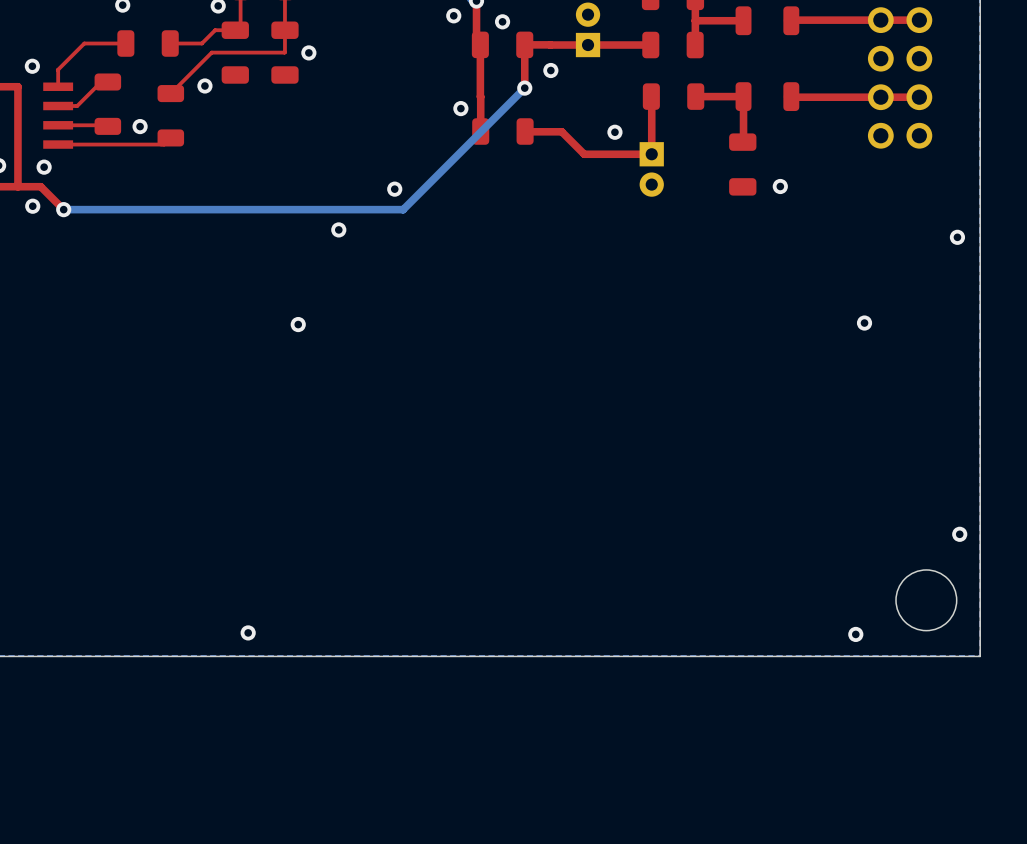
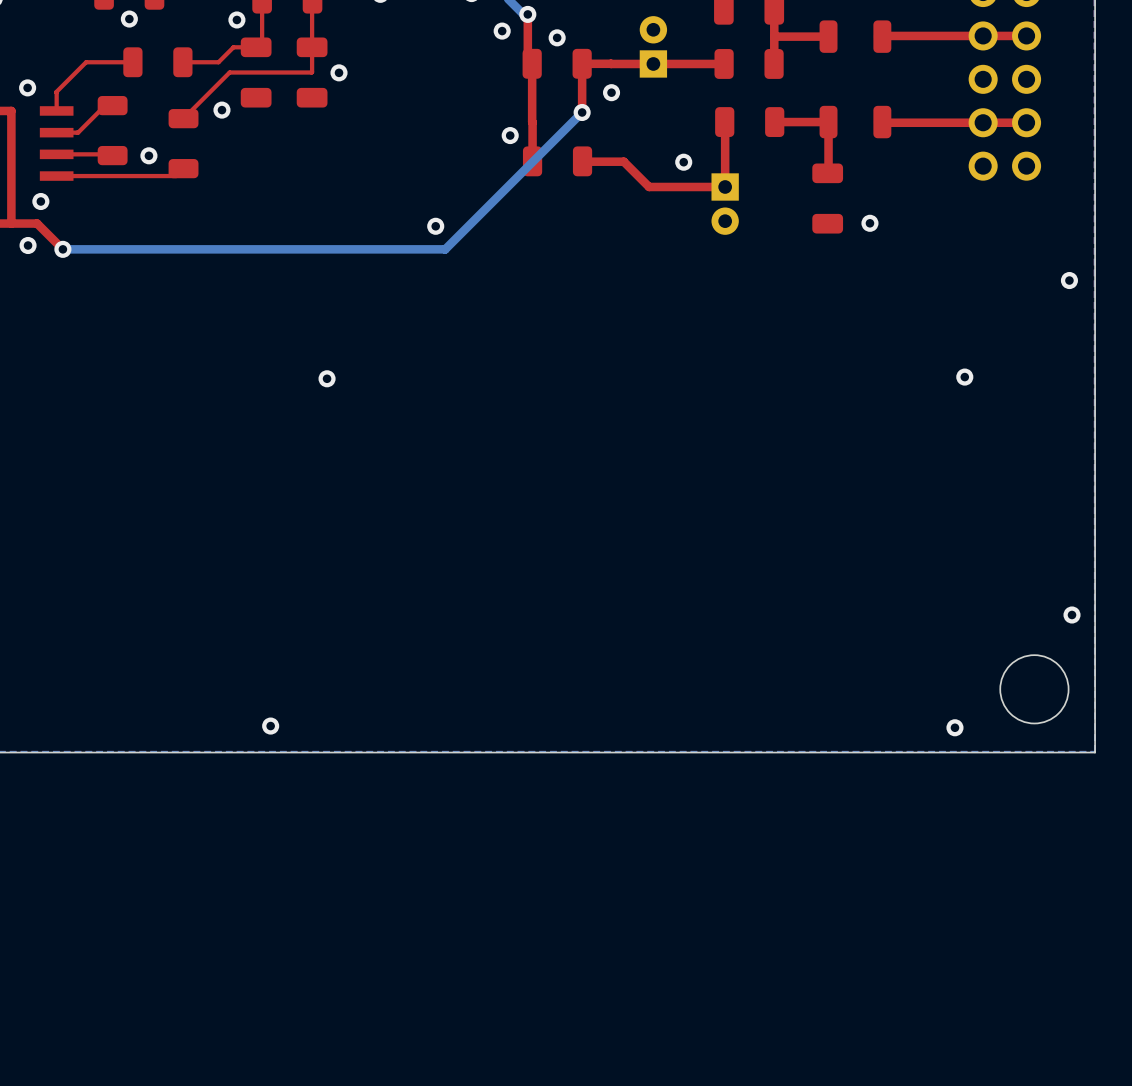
via: (338, 229) -> none

